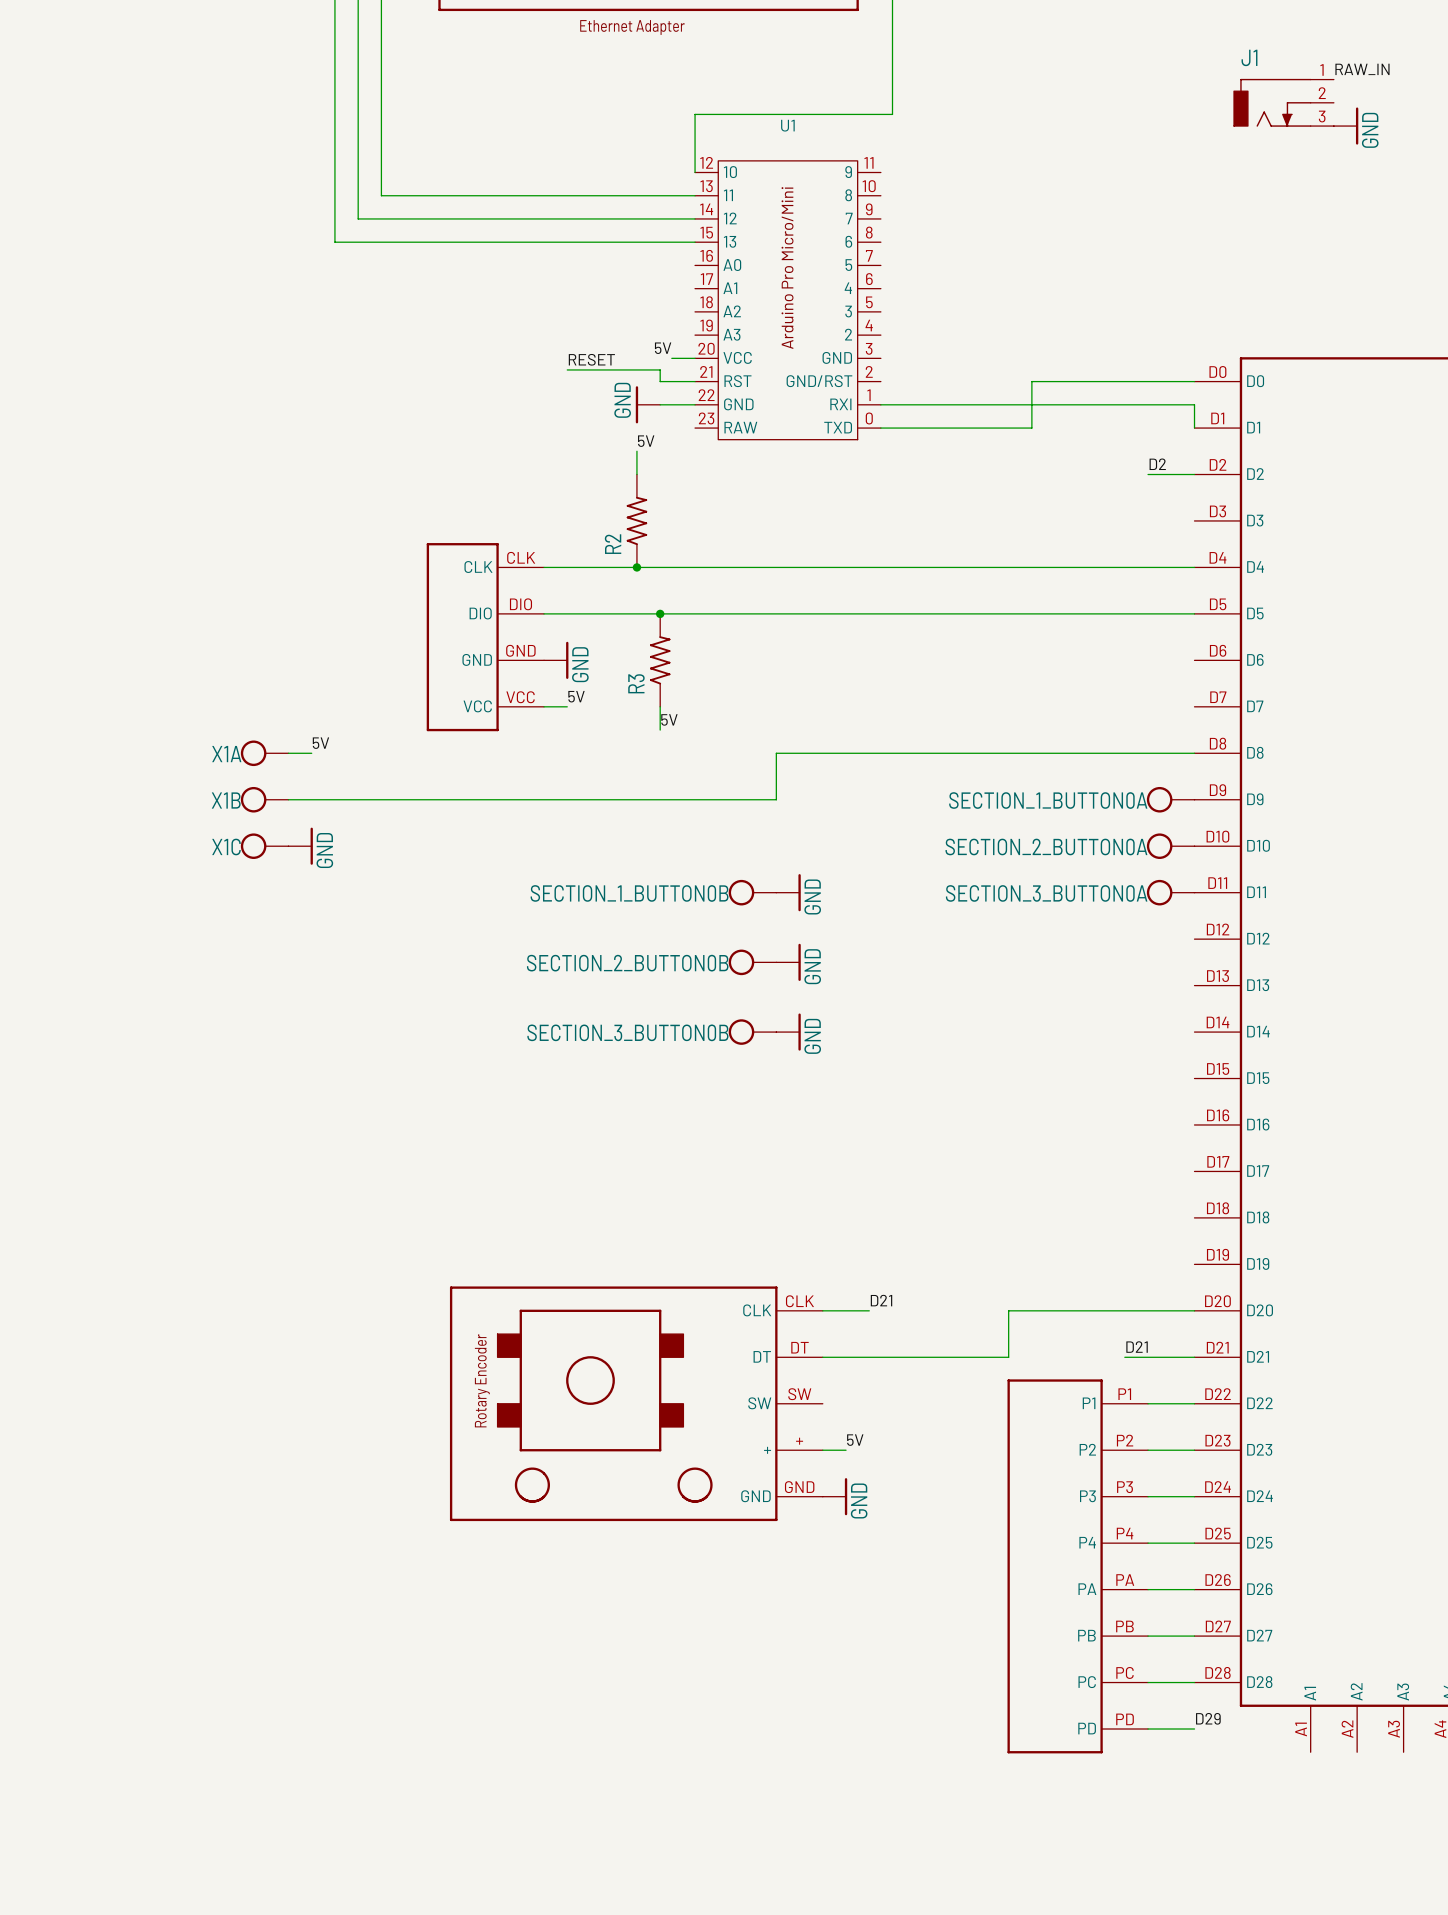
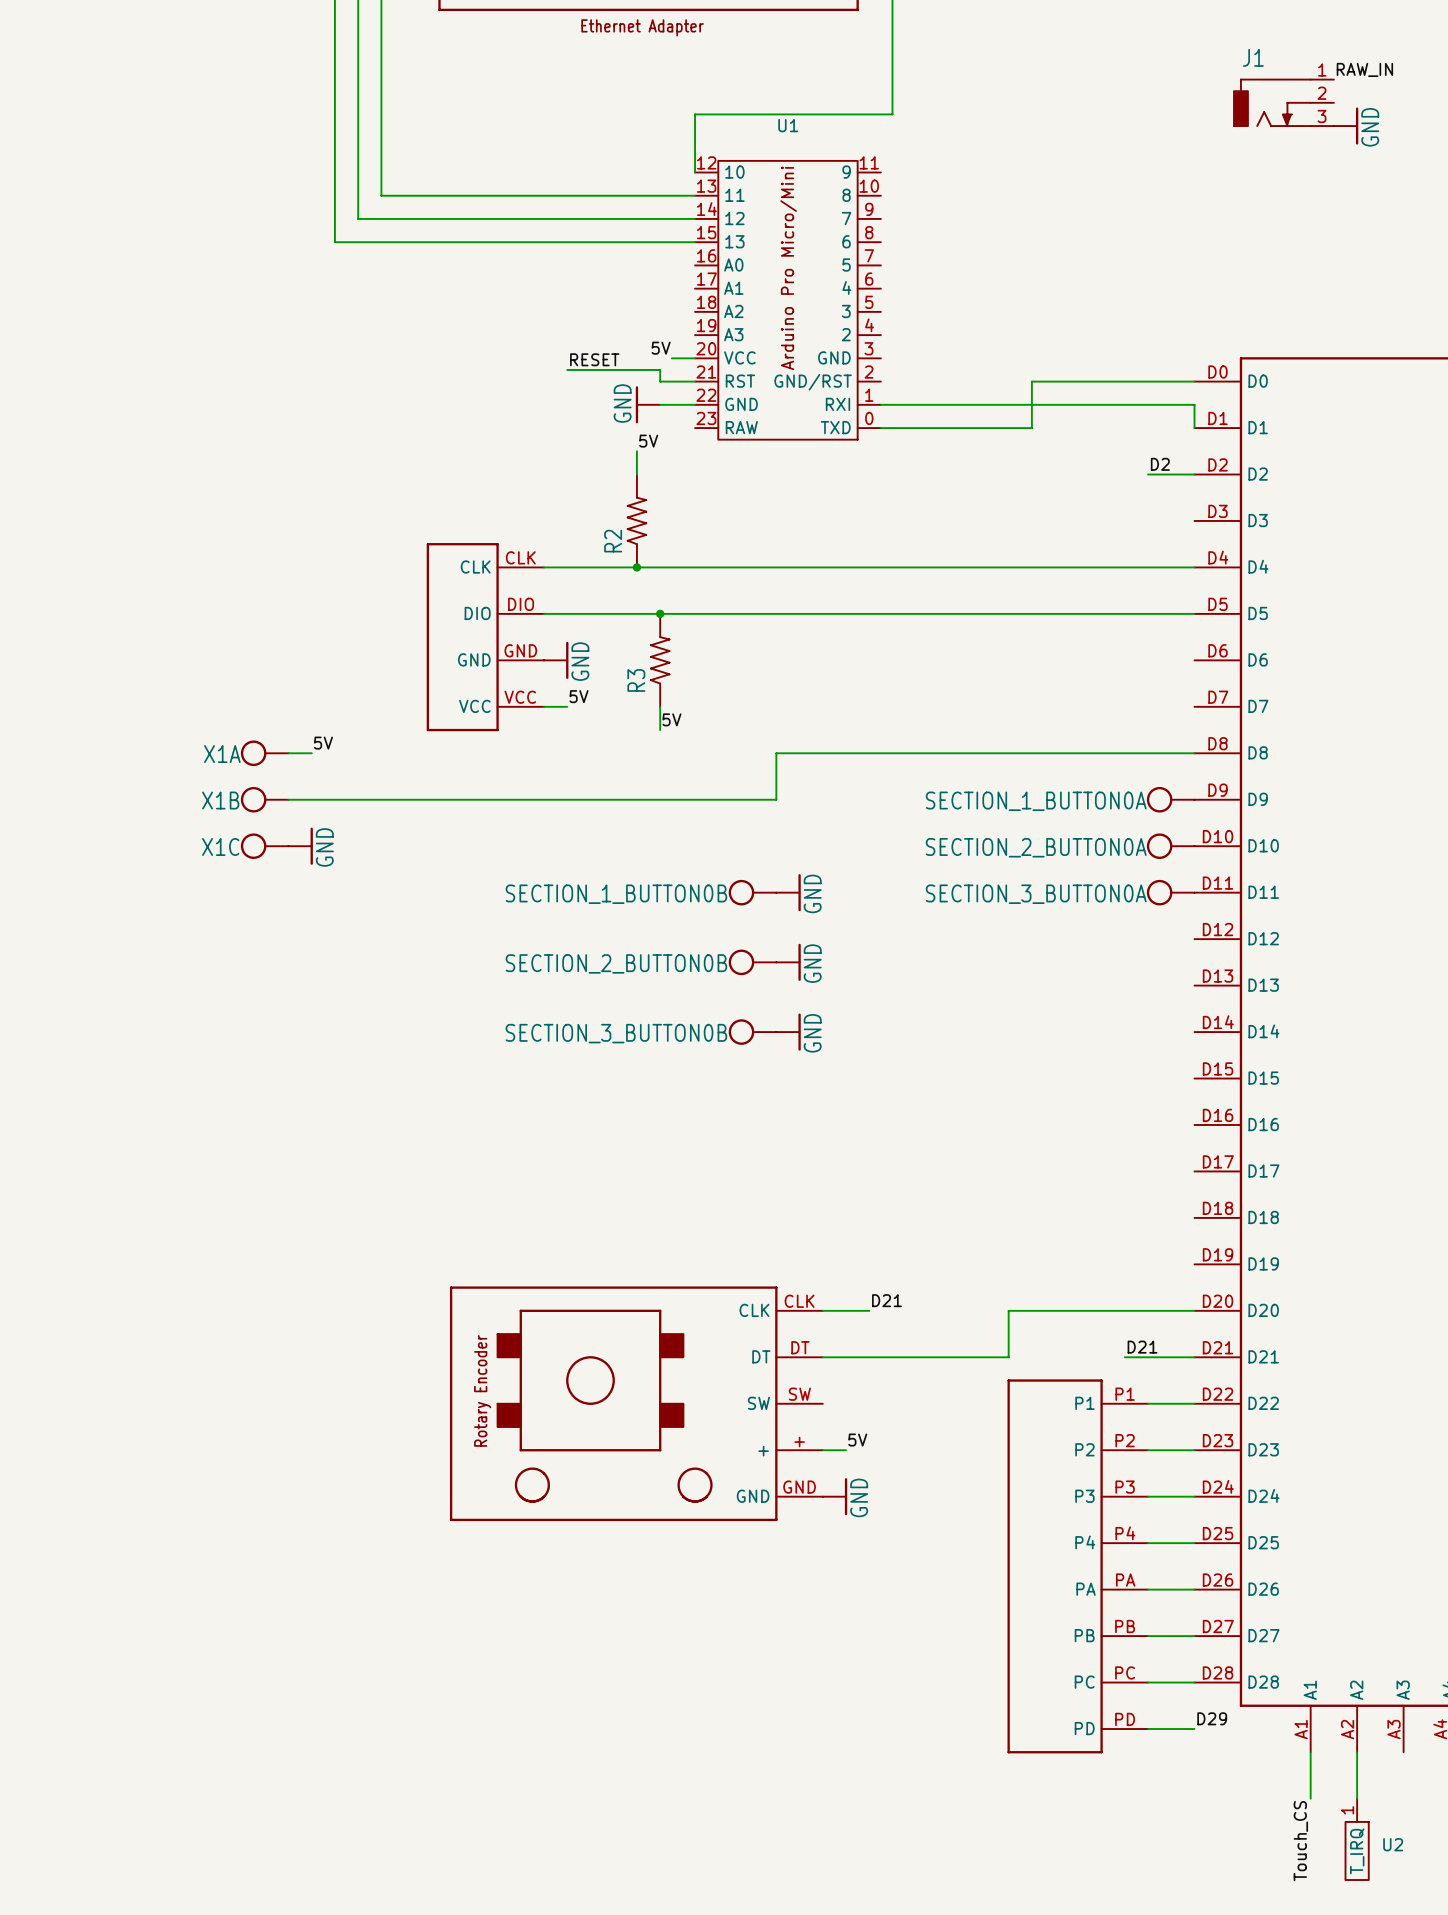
wire: none -> (1310, 1752) (1310, 1798)
wire: none -> (1357, 1752) (1357, 1798)
label: none -> Touch_CS (1300, 1841)
U2: none -> (1357, 1839)

